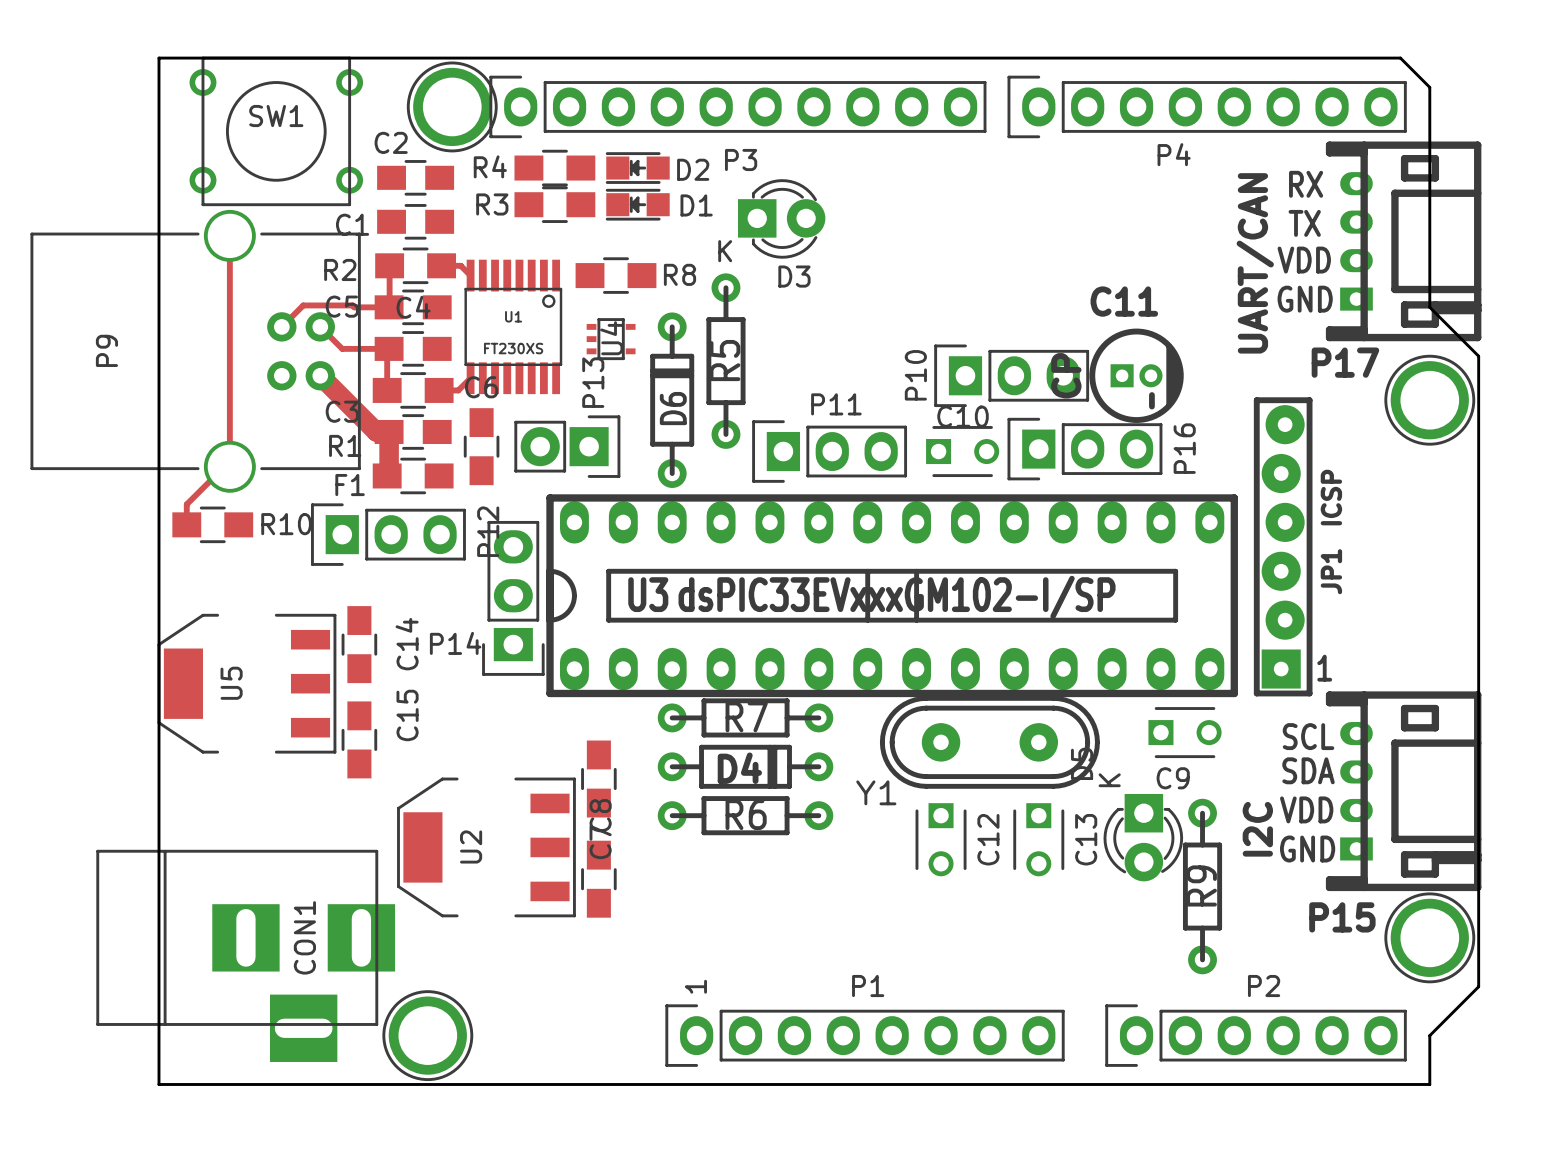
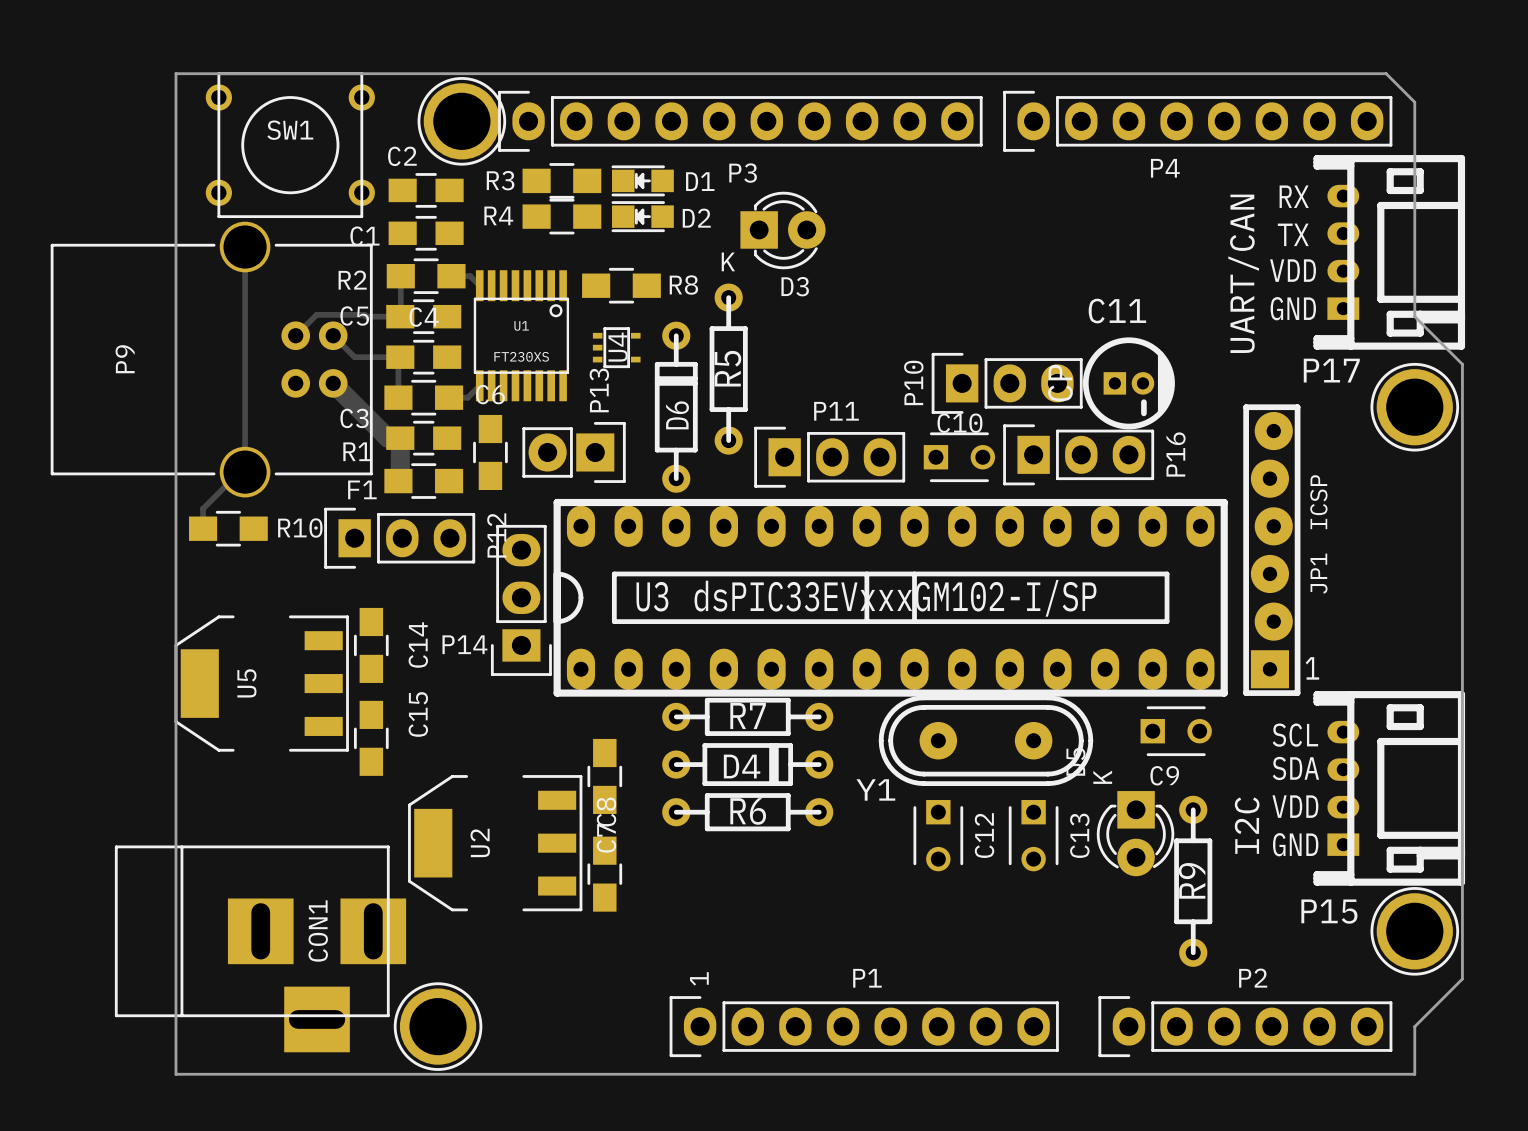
R4 name: R4 (490, 166) -> R3 (500, 180)
D2 name: D2 (693, 169) -> D1 (700, 181)
R3 name: R3 (492, 204) -> R4 (498, 215)
D1 name: D1 (696, 205) -> D2 (696, 218)

